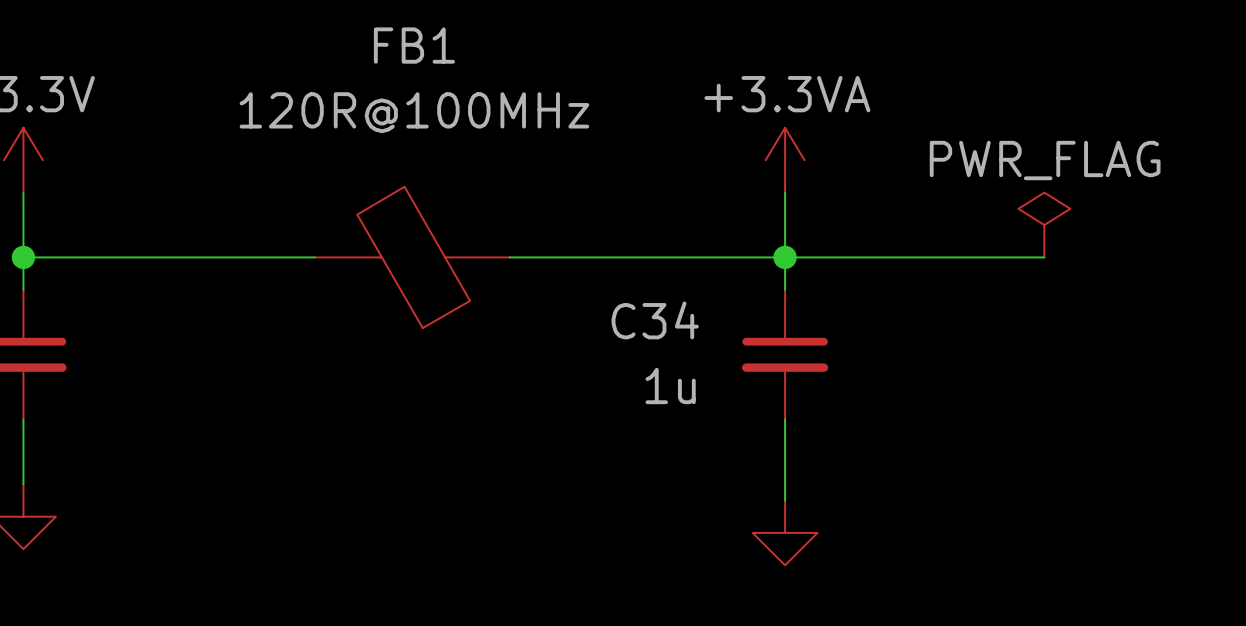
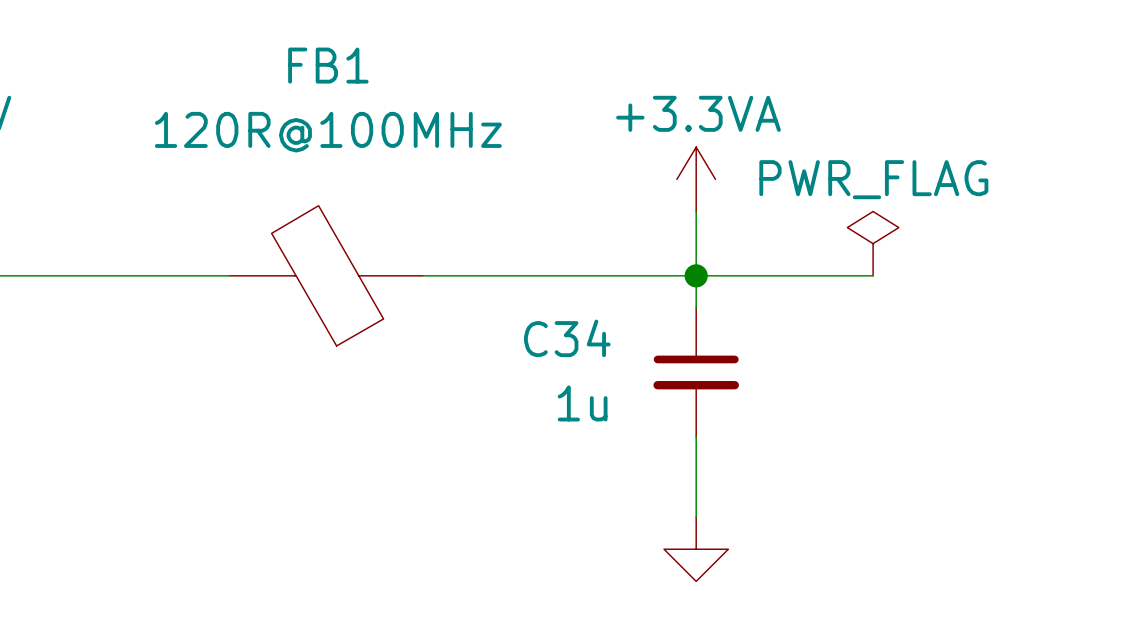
power symbol position: PWR_FLAG (1044, 225) -> PWR_FLAG (873, 243)
wire: (963, 257) (1044, 257) -> none

